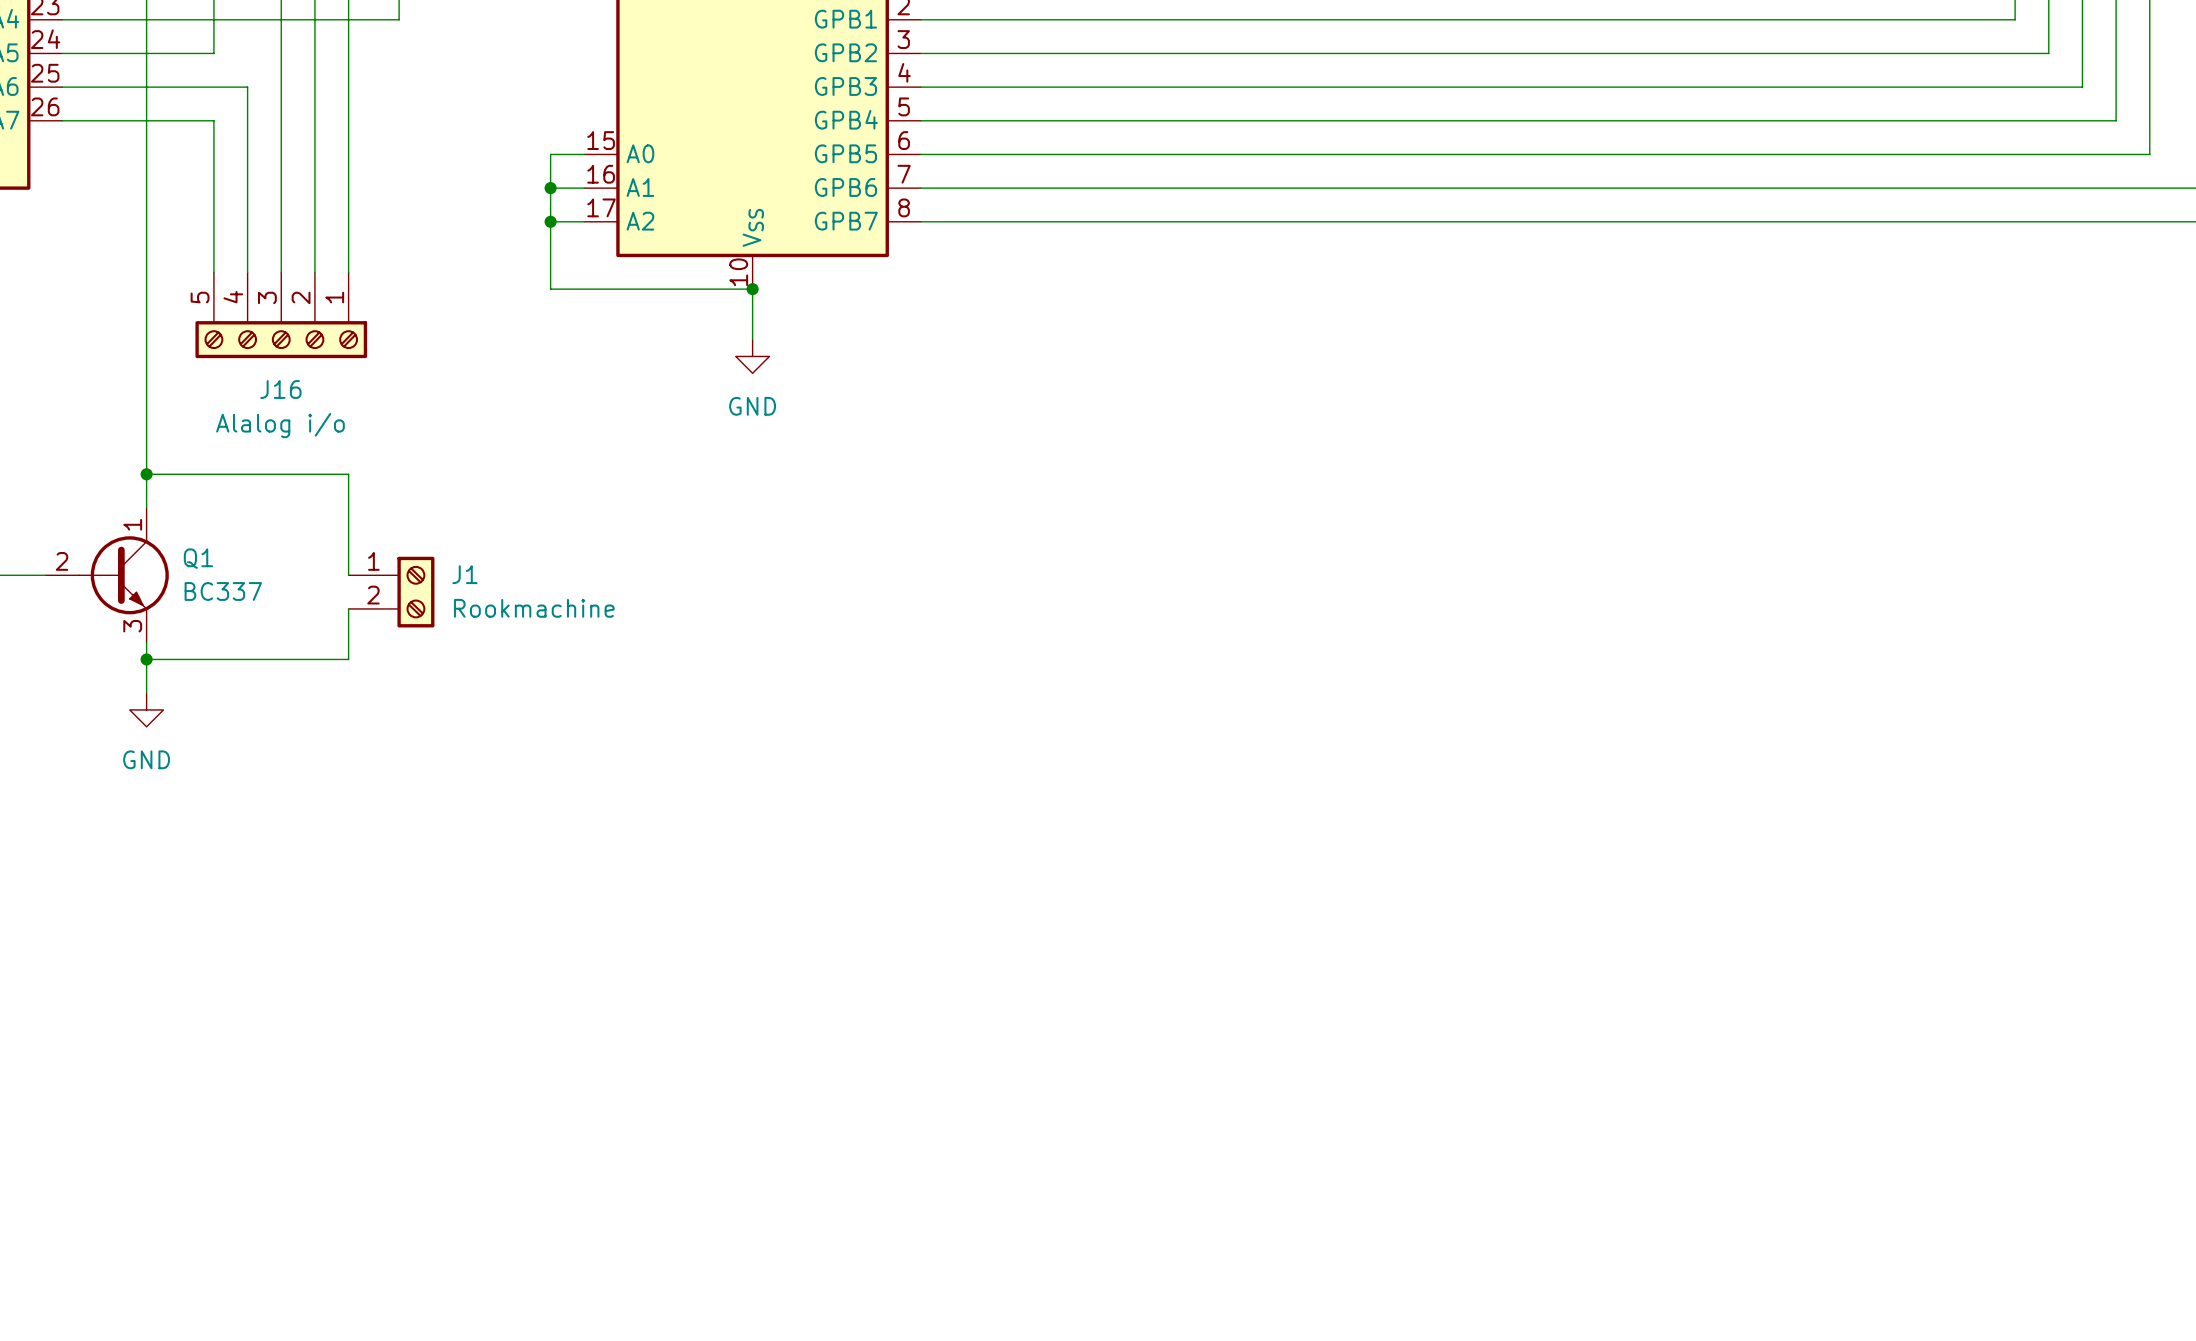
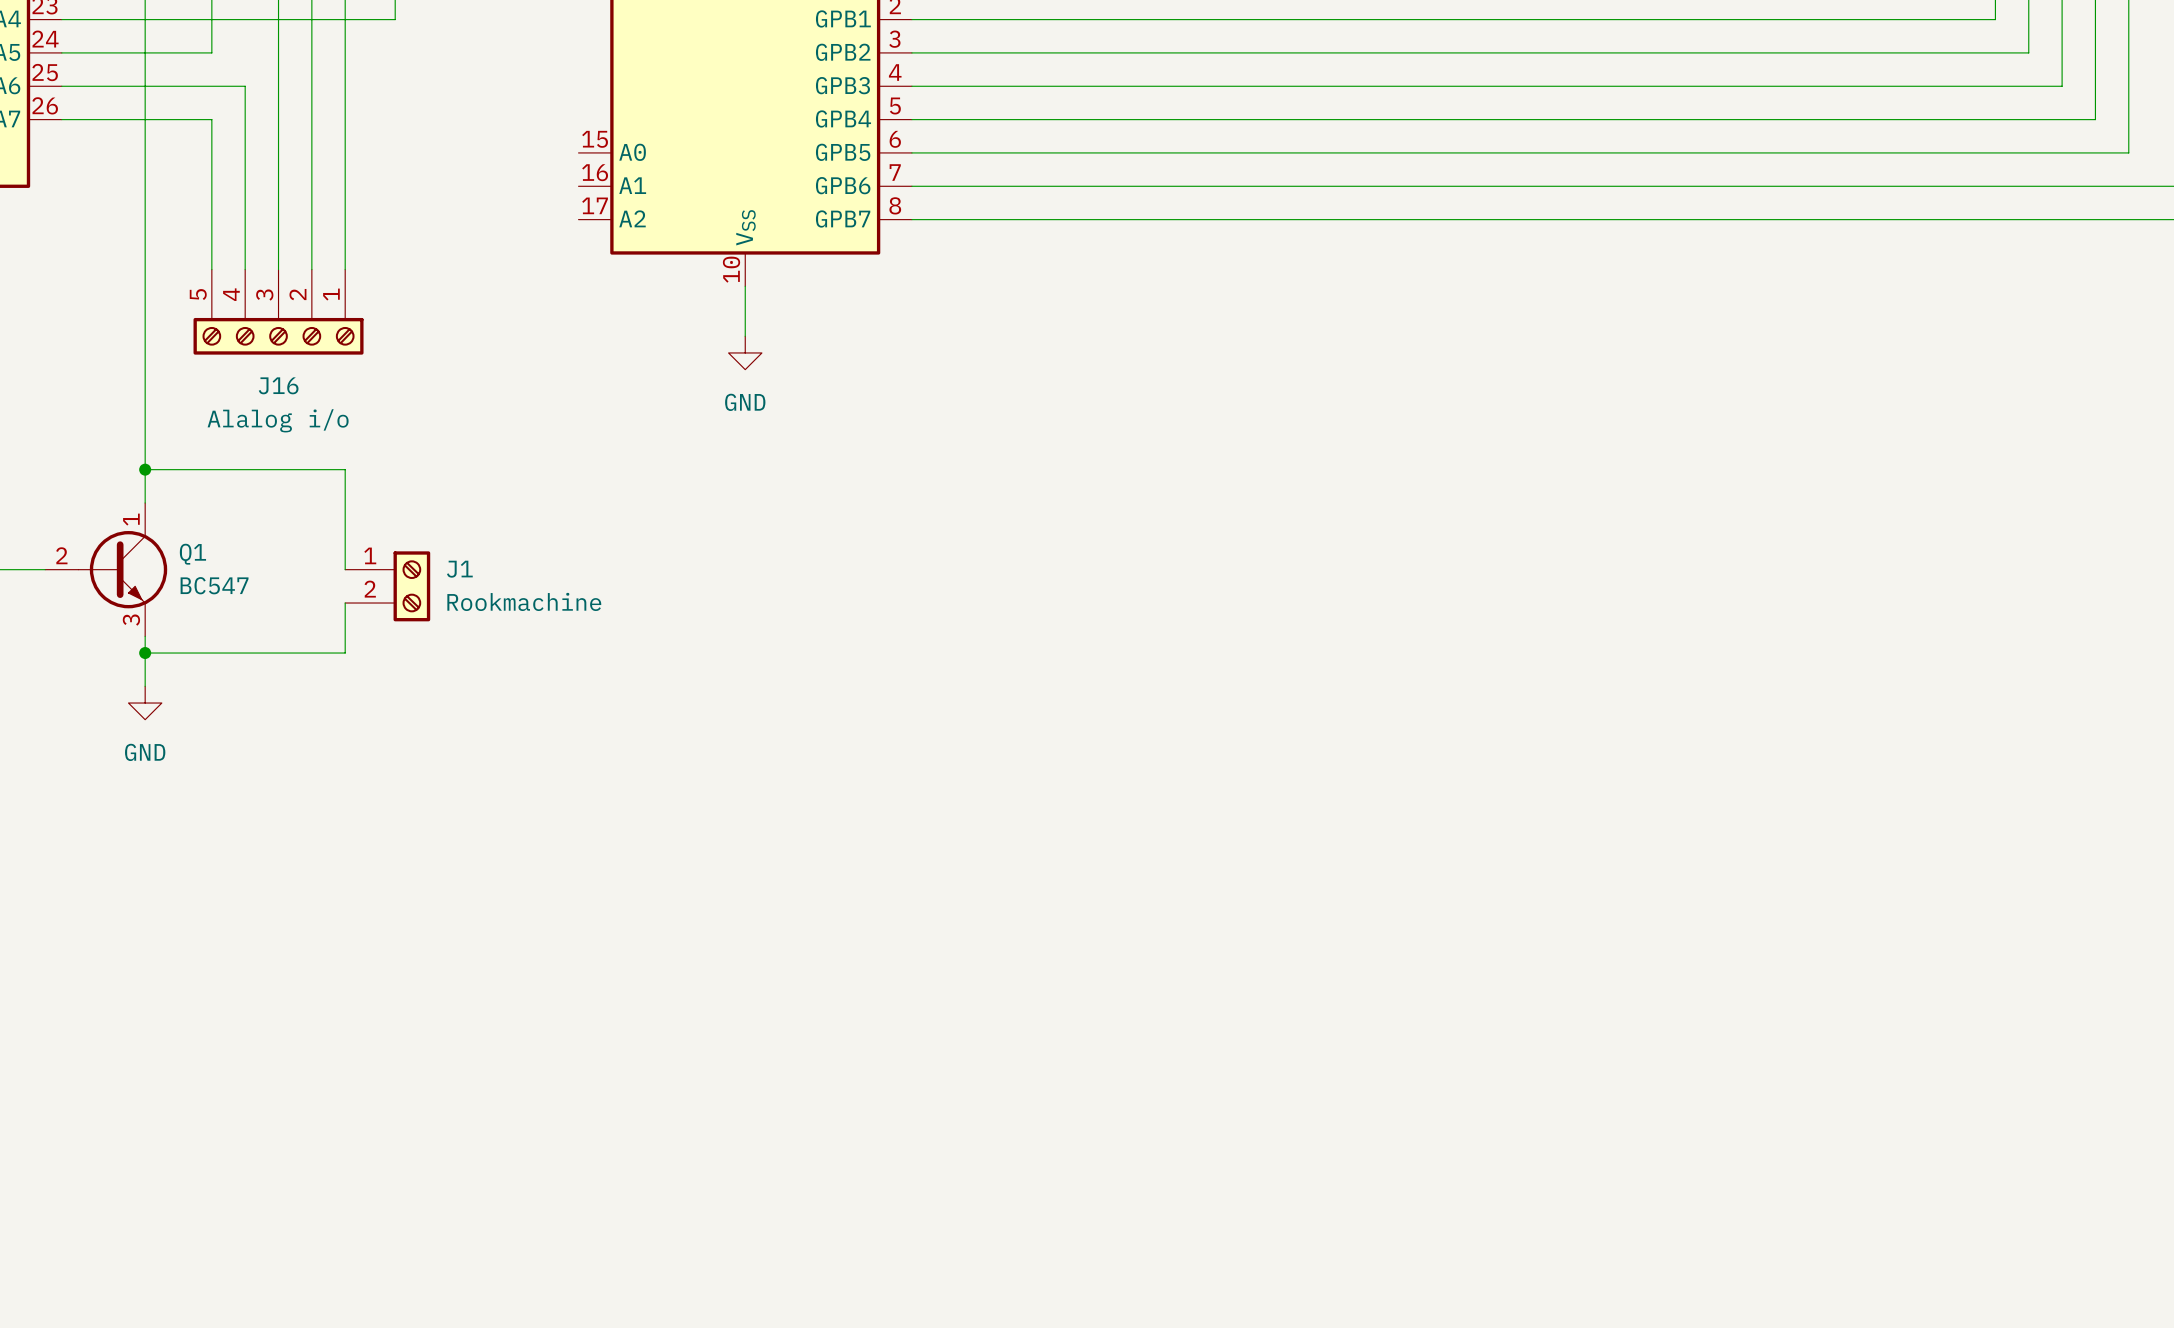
wire: (584, 154) (550, 154) (550, 289) (752, 289) -> none
wire: (550, 188) (584, 188) -> none
junction: (550, 188) -> none
wire: (550, 221) (584, 221) -> none
junction: (550, 221) -> none
junction: (752, 289) -> none
Q1 value: BC337 (223, 591) -> BC547 (214, 585)

